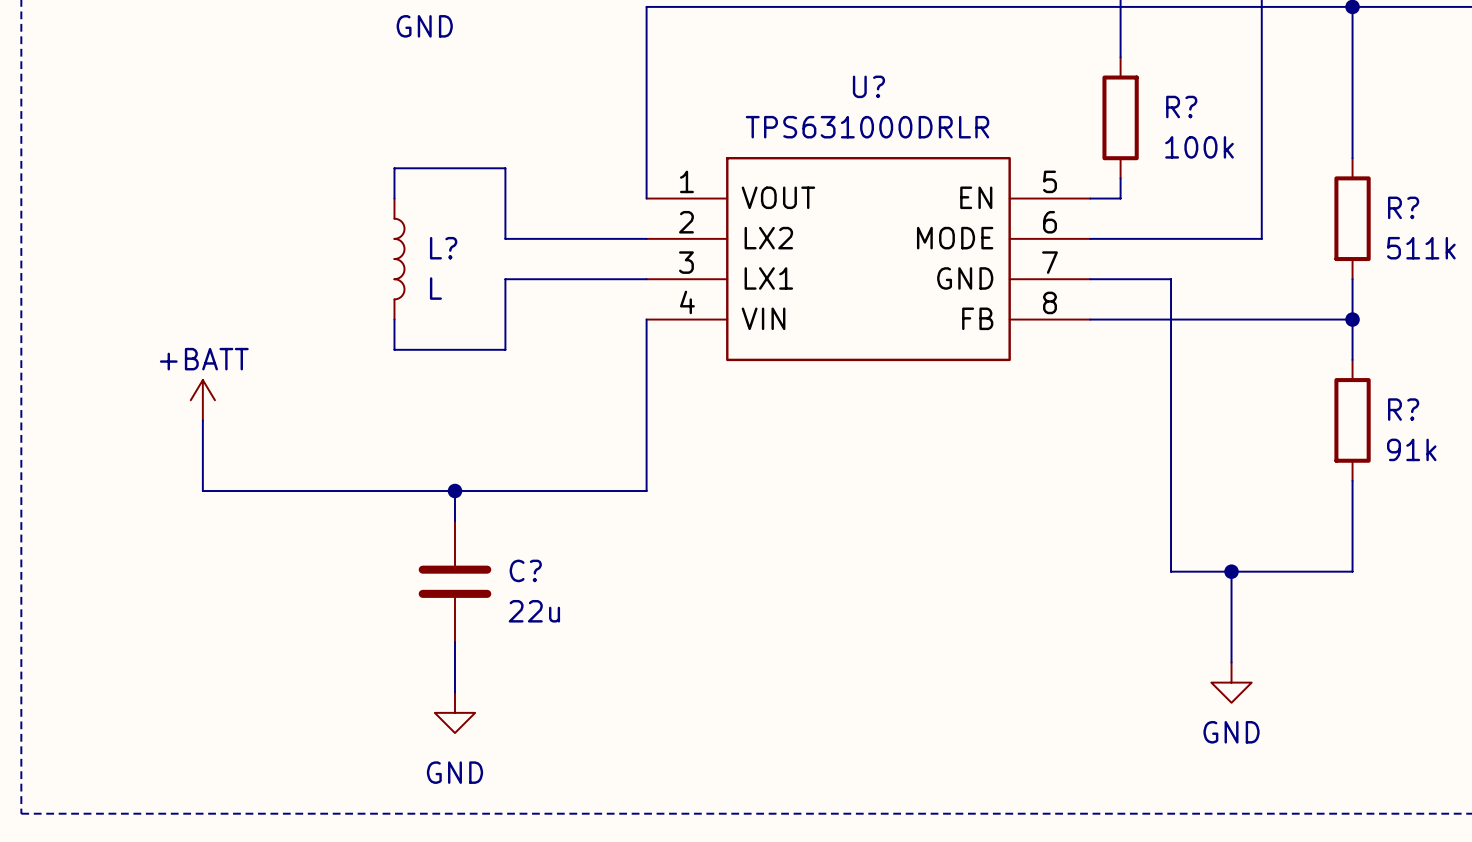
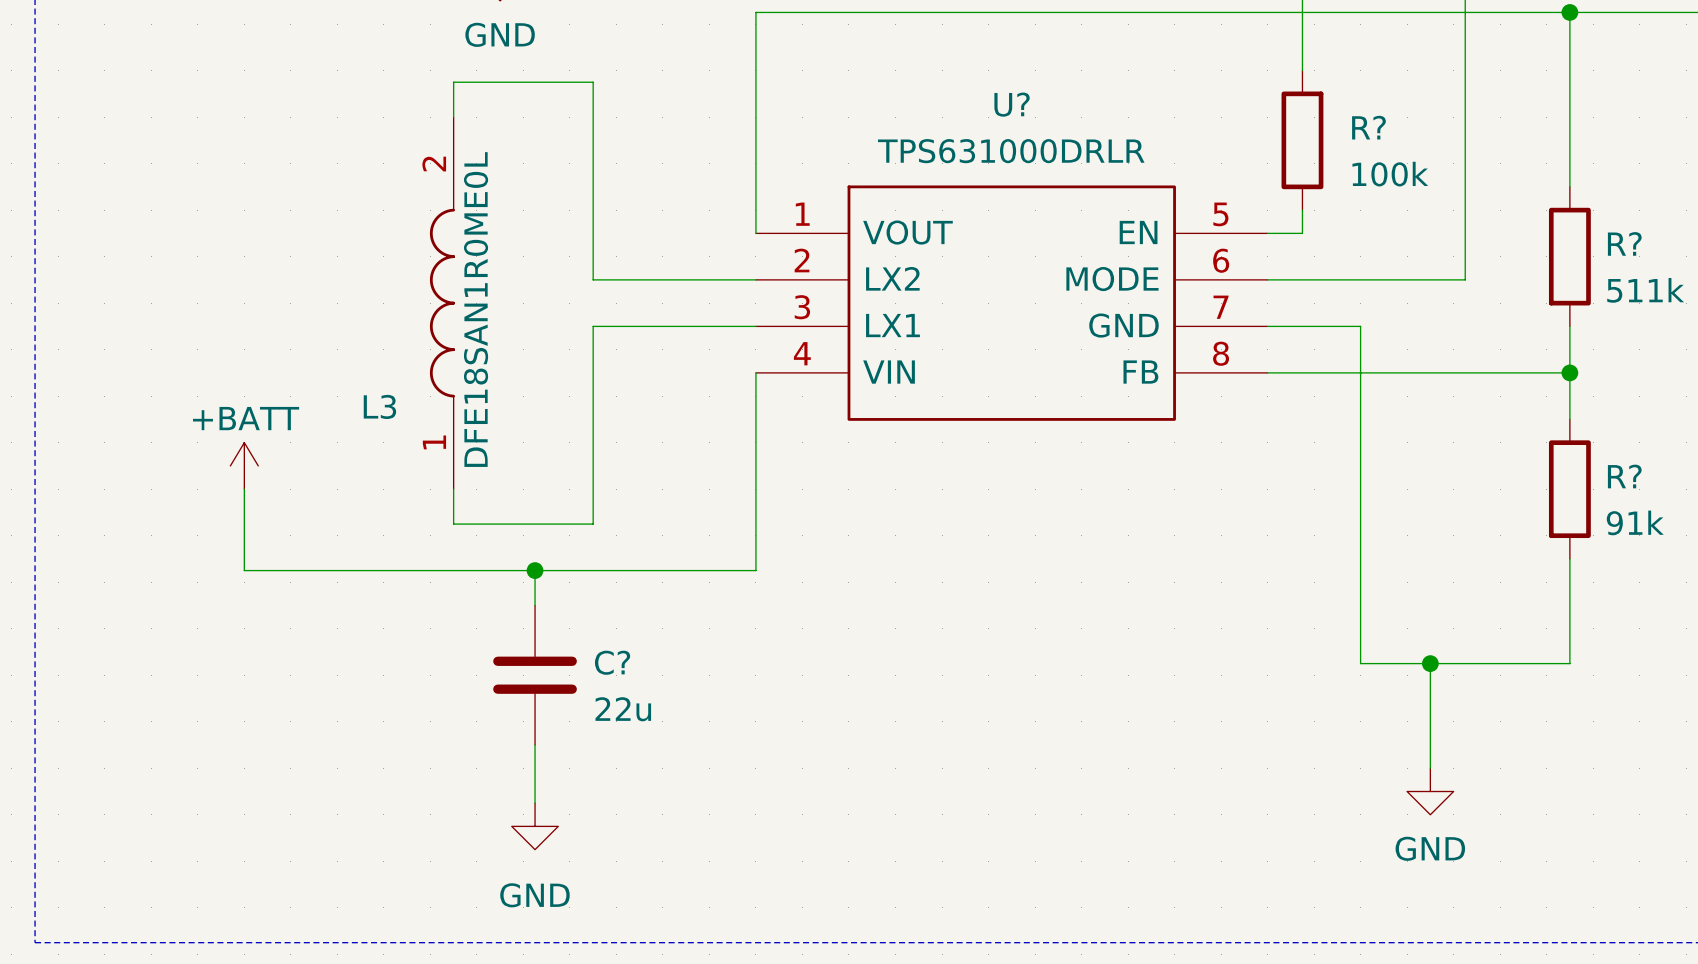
wire: (505, 168) (394, 168) (394, 198) -> (593, 198) (593, 82) (453, 82) (453, 117)
L3: none -> DFE18SAN1R0ME0L (442, 303)
L?: L (399, 259) -> none
wire: (394, 319) (394, 349) (505, 349) -> (453, 489) (453, 524) (593, 524) (593, 407)

